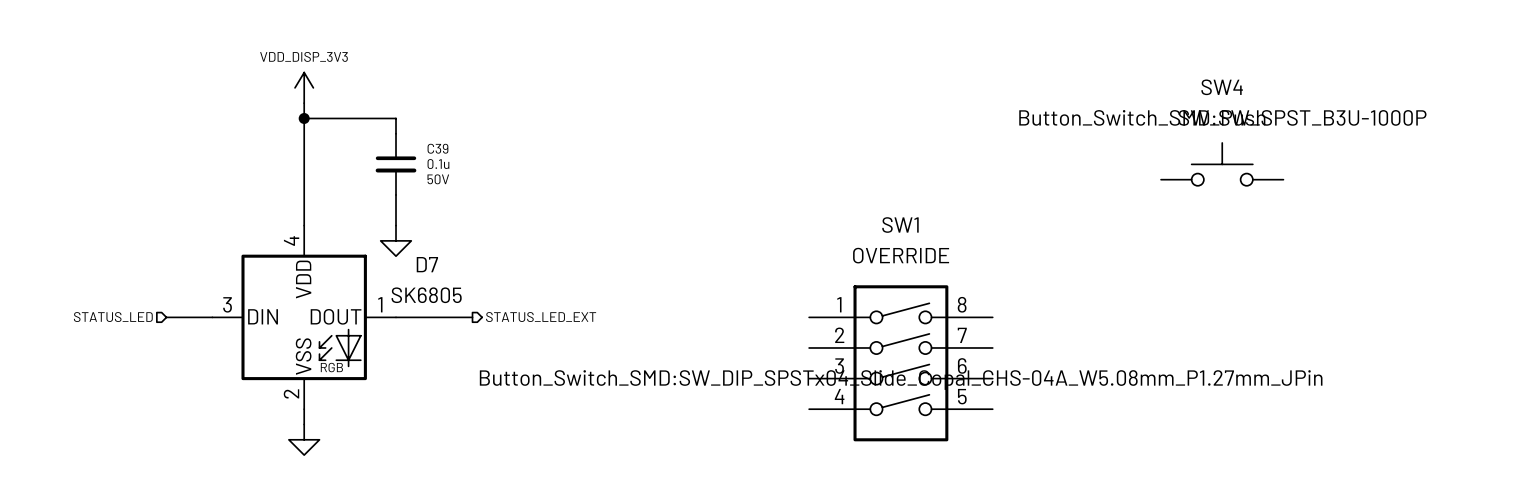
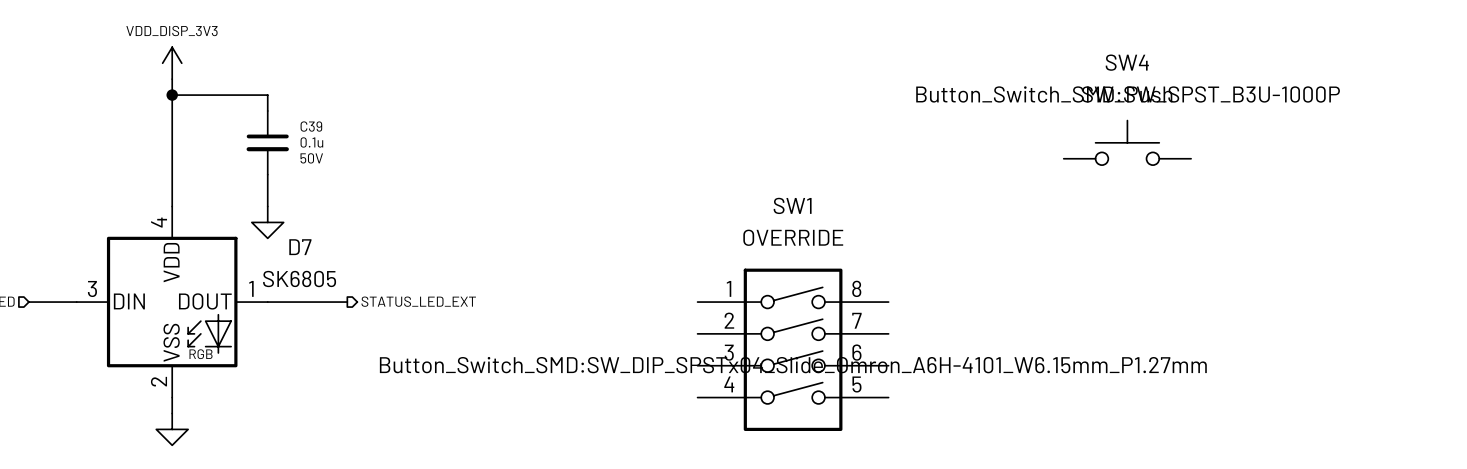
SW1 text: Button_Switch_SMD:SW_DIP_SPSTx04_Slide_Copal_CHS-04A_W5.08mm_P1.27mm_JPin (901, 380) -> Button_Switch_SMD:SW_DIP_SPSTx04_Slide_Omron_A6H-4101_W6.15mm_P1.27mm (793, 365)

